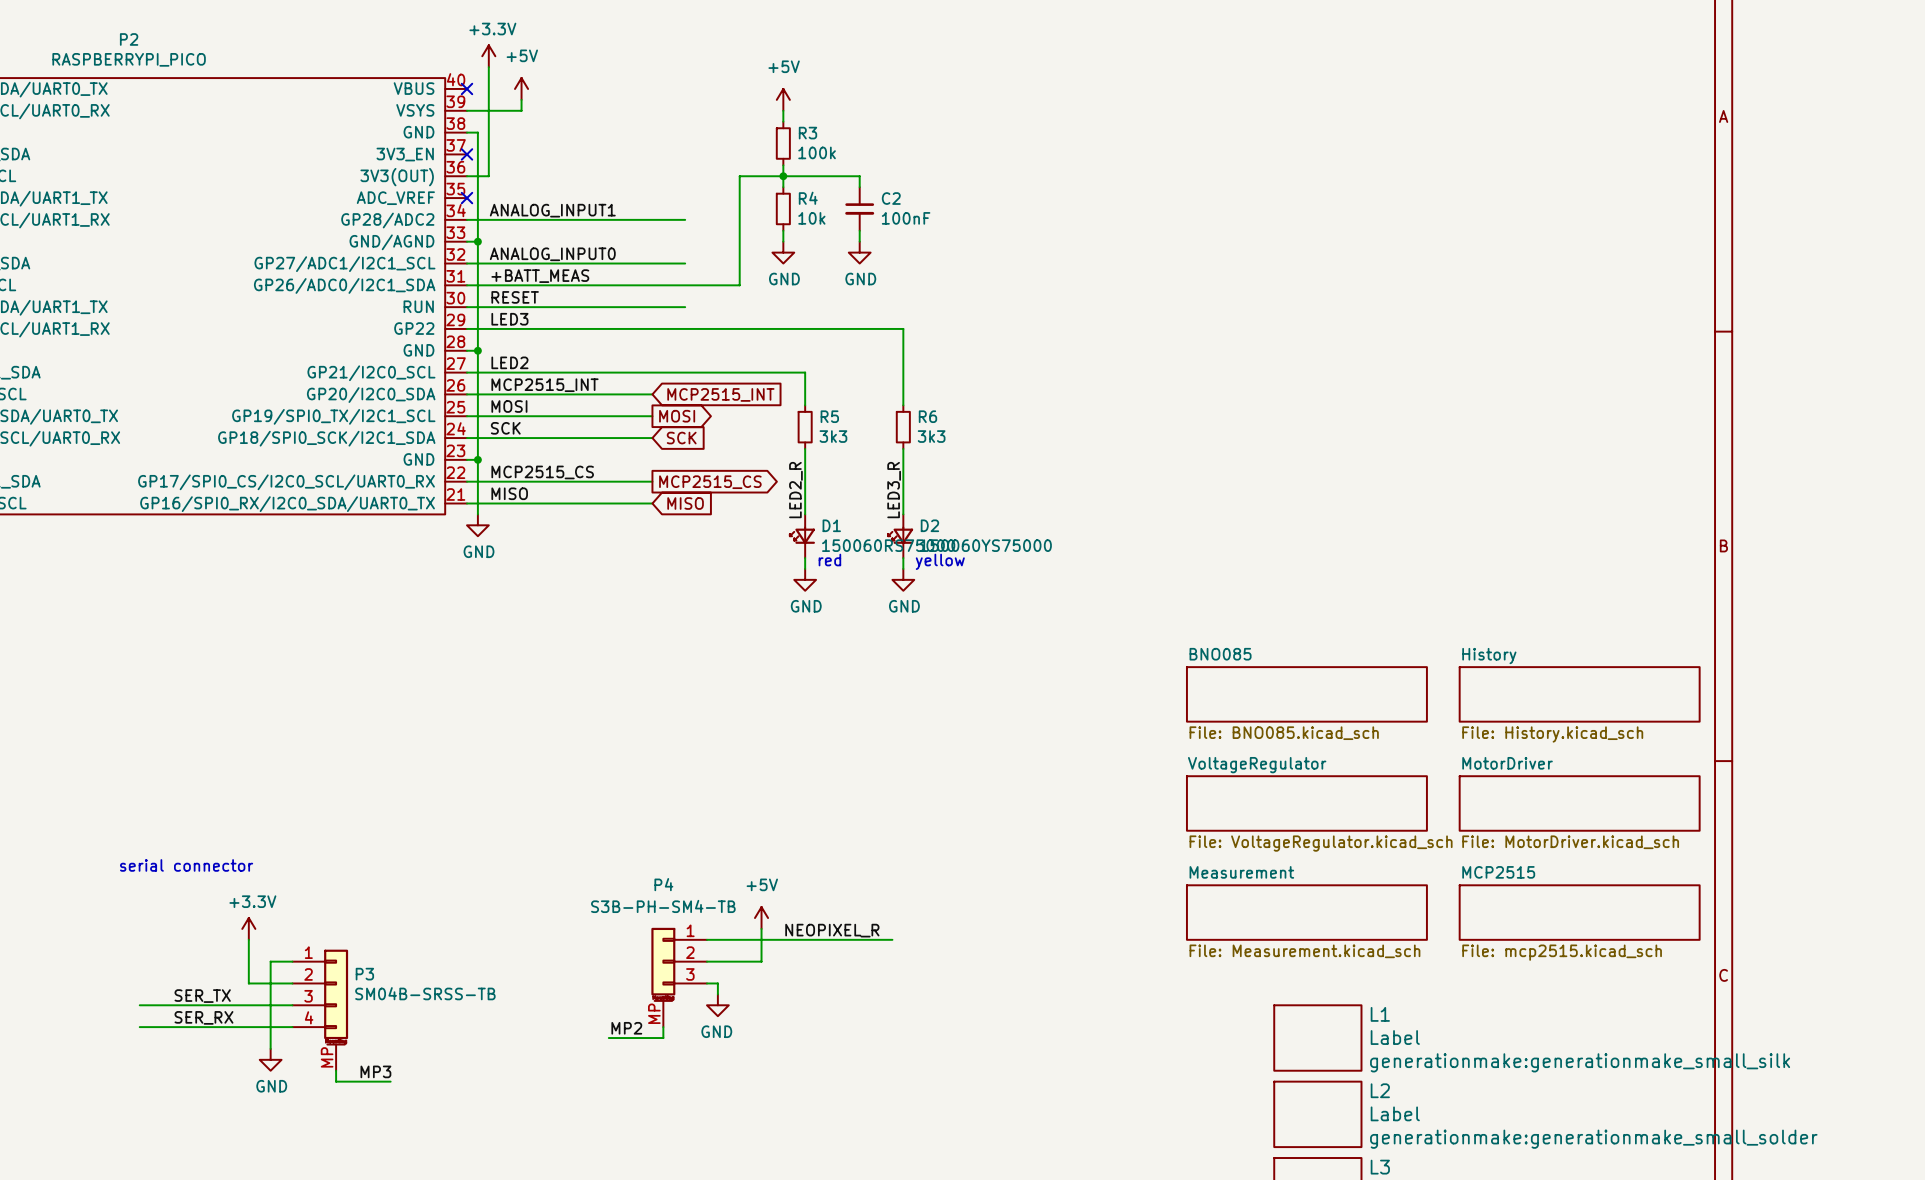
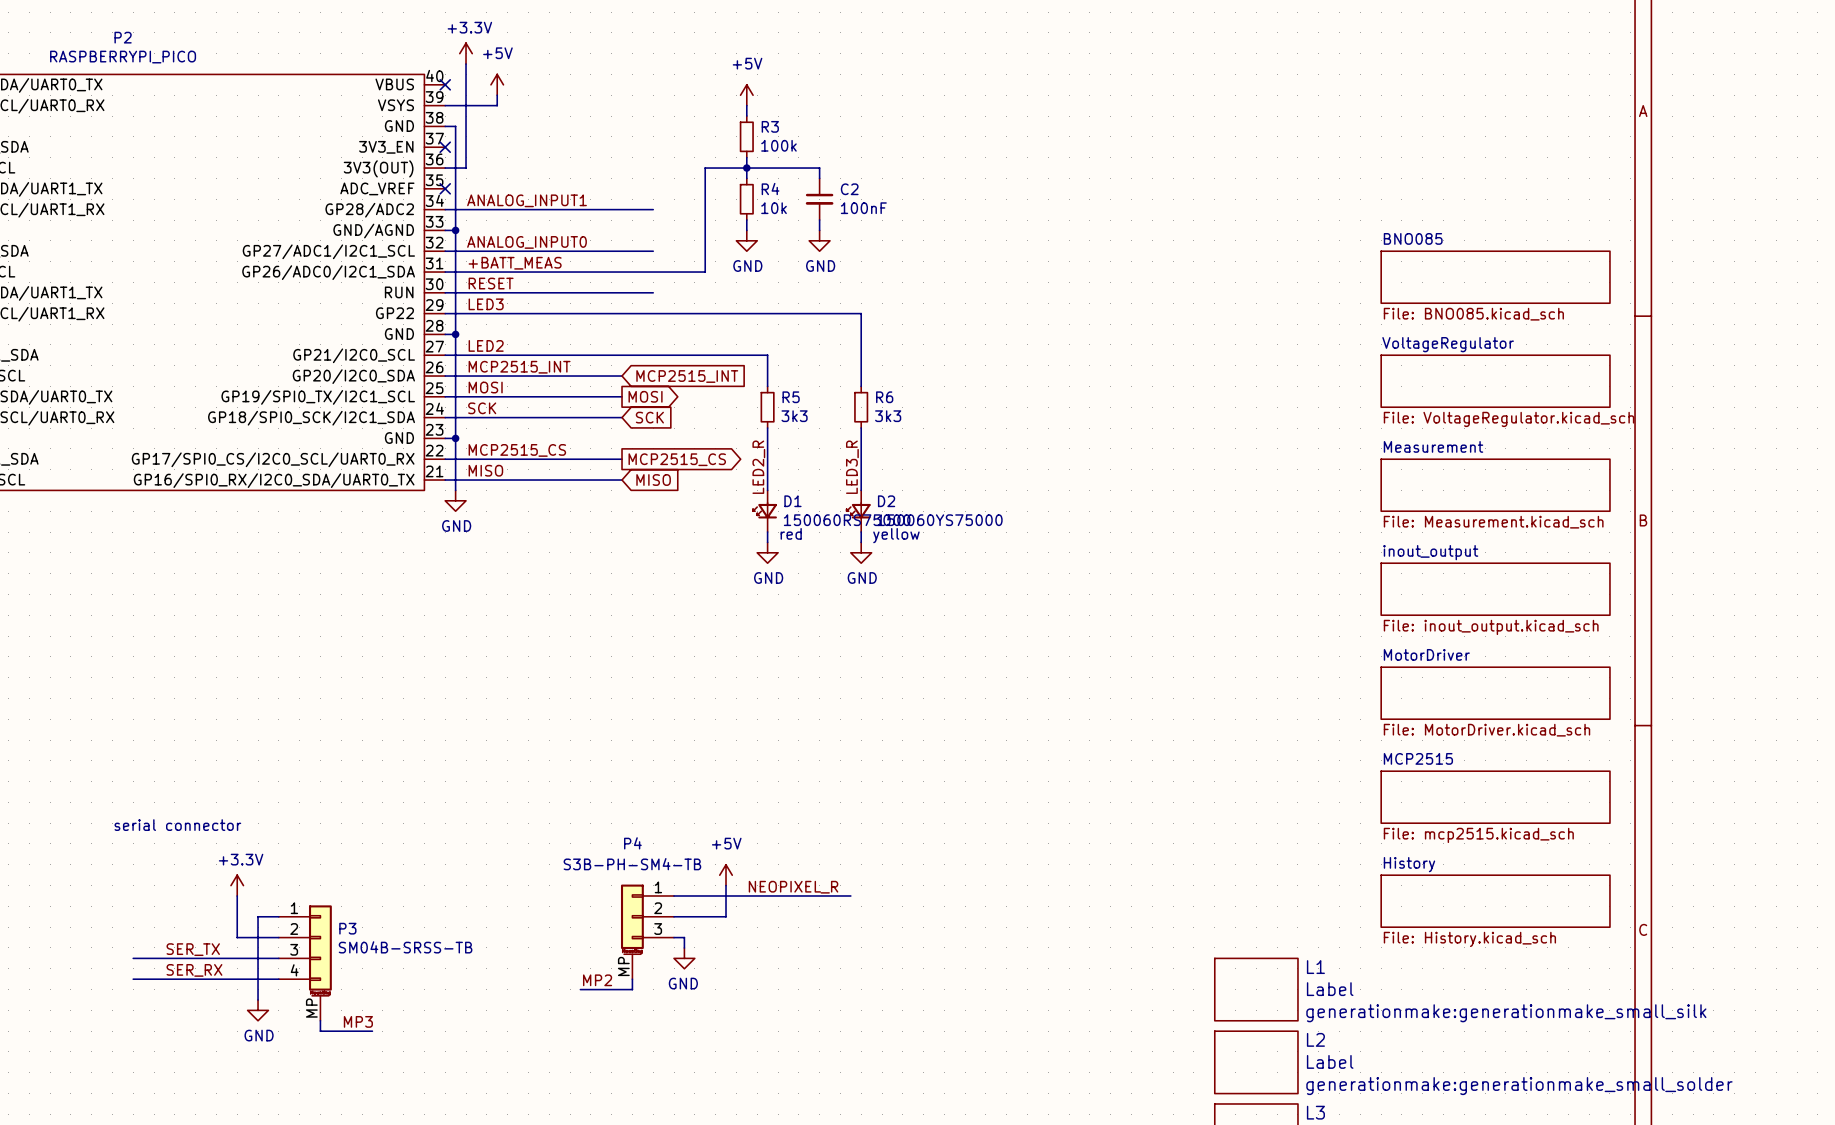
sheet VoltageRegulator: none -> File: VoltageRegulator.kicad_sch (1495, 381)
sheet Measurement: none -> File: Measurement.kicad_sch (1495, 485)
sheet inout_output: none -> File: inout_output.kicad_sch (1495, 589)
sheet BNO085 position: (1306, 694) -> (1495, 277)
sheet History: File: History.kicad_sch (1579, 694) -> none
sheet VoltageRegulator: File: VoltageRegulator.kicad_sch (1306, 803) -> none
sheet MotorDriver position: (1579, 803) -> (1495, 693)
sheet Measurement: File: Measurement.kicad_sch (1306, 912) -> none
sheet MCP2515 position: (1579, 912) -> (1495, 797)
sheet History: none -> File: History.kicad_sch (1495, 901)

